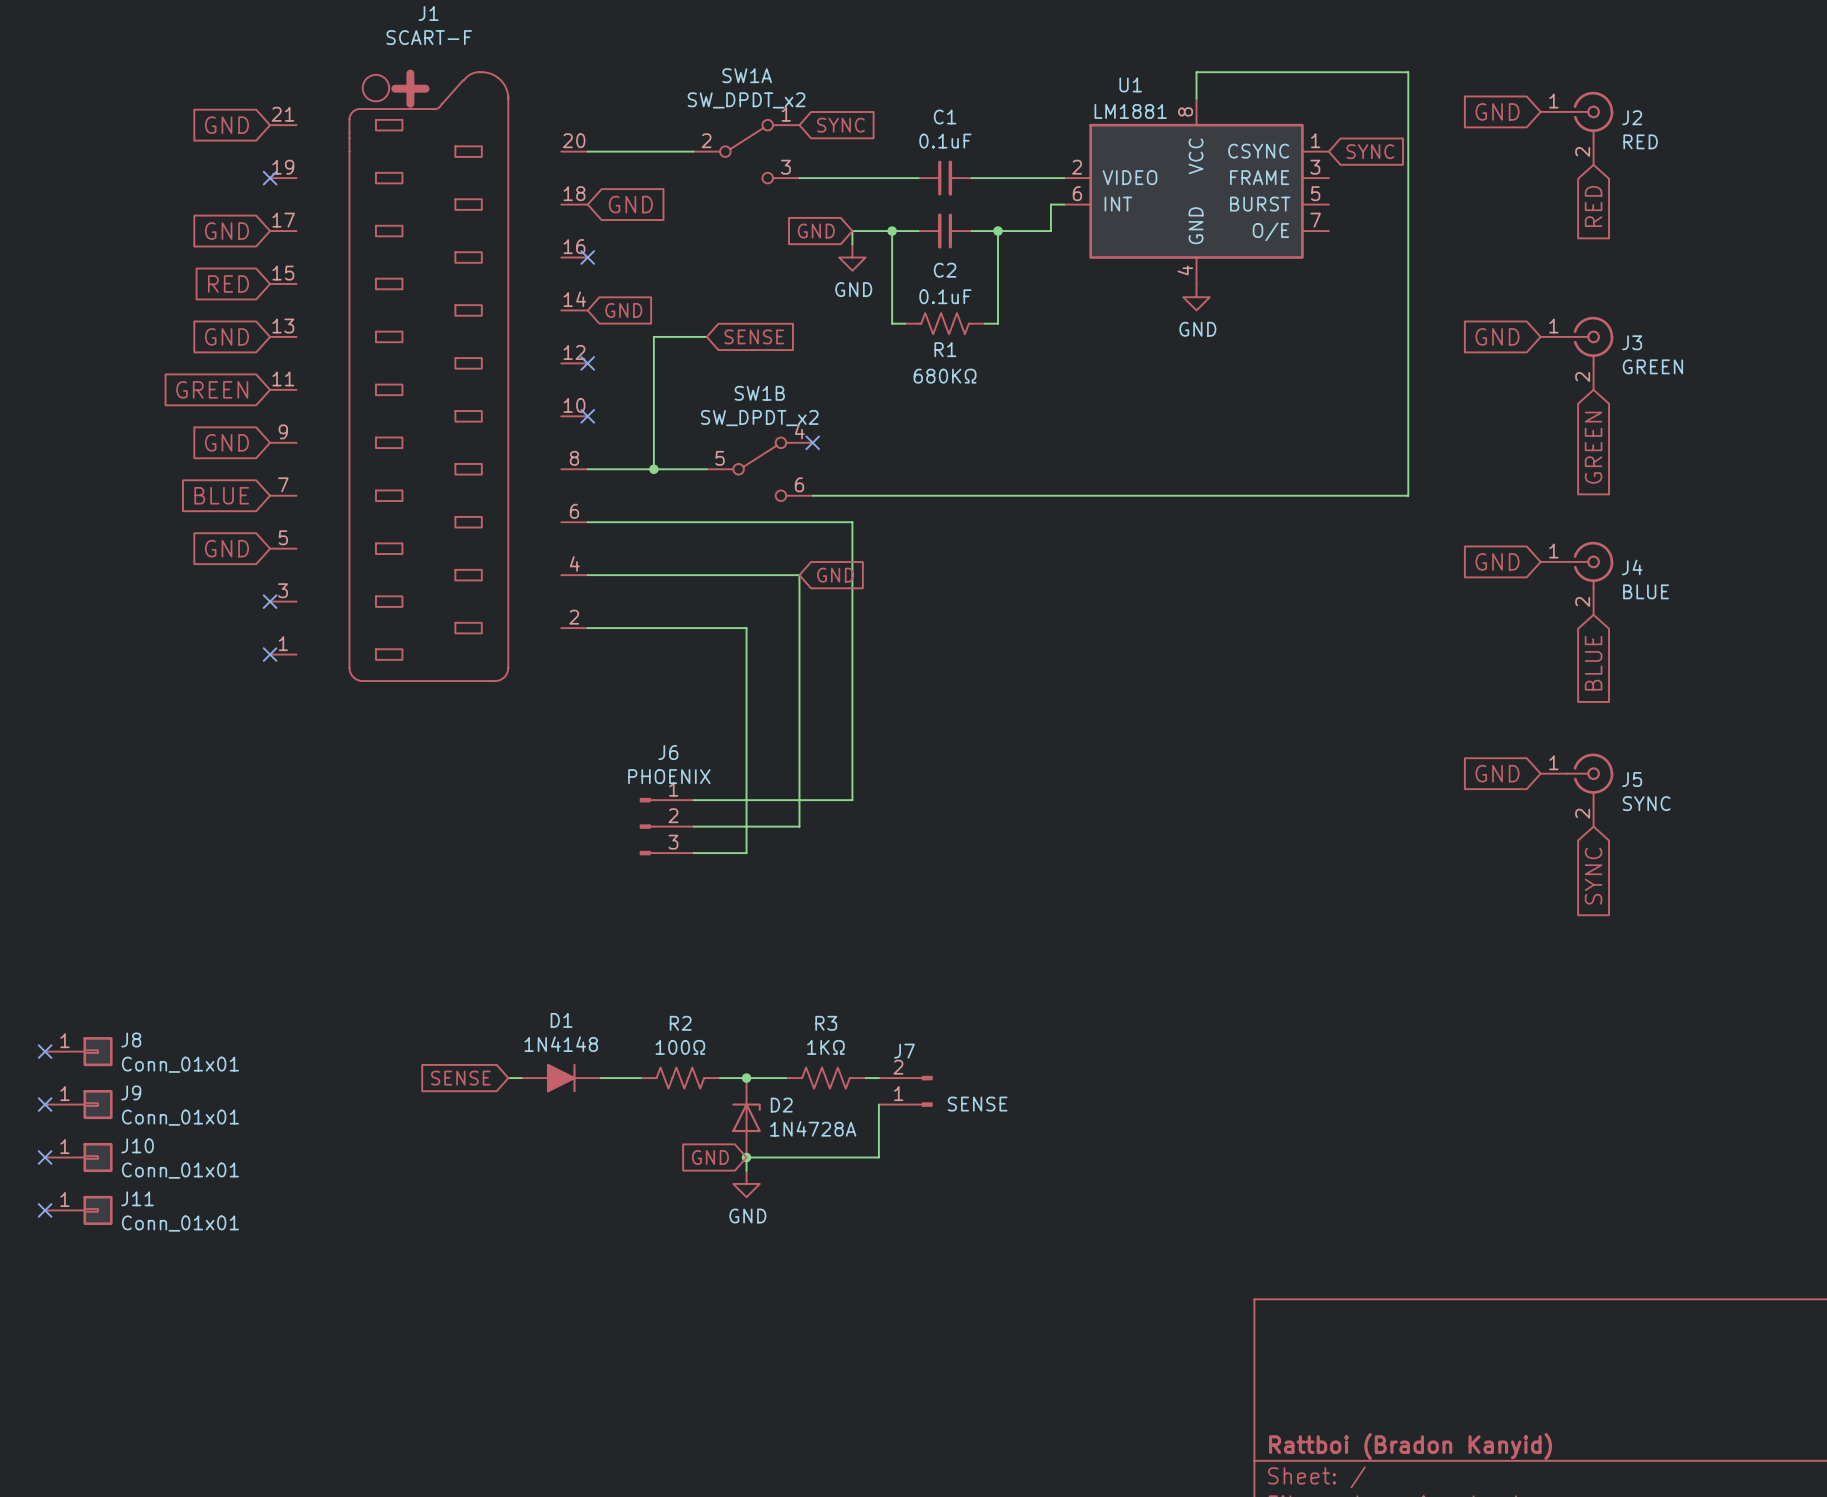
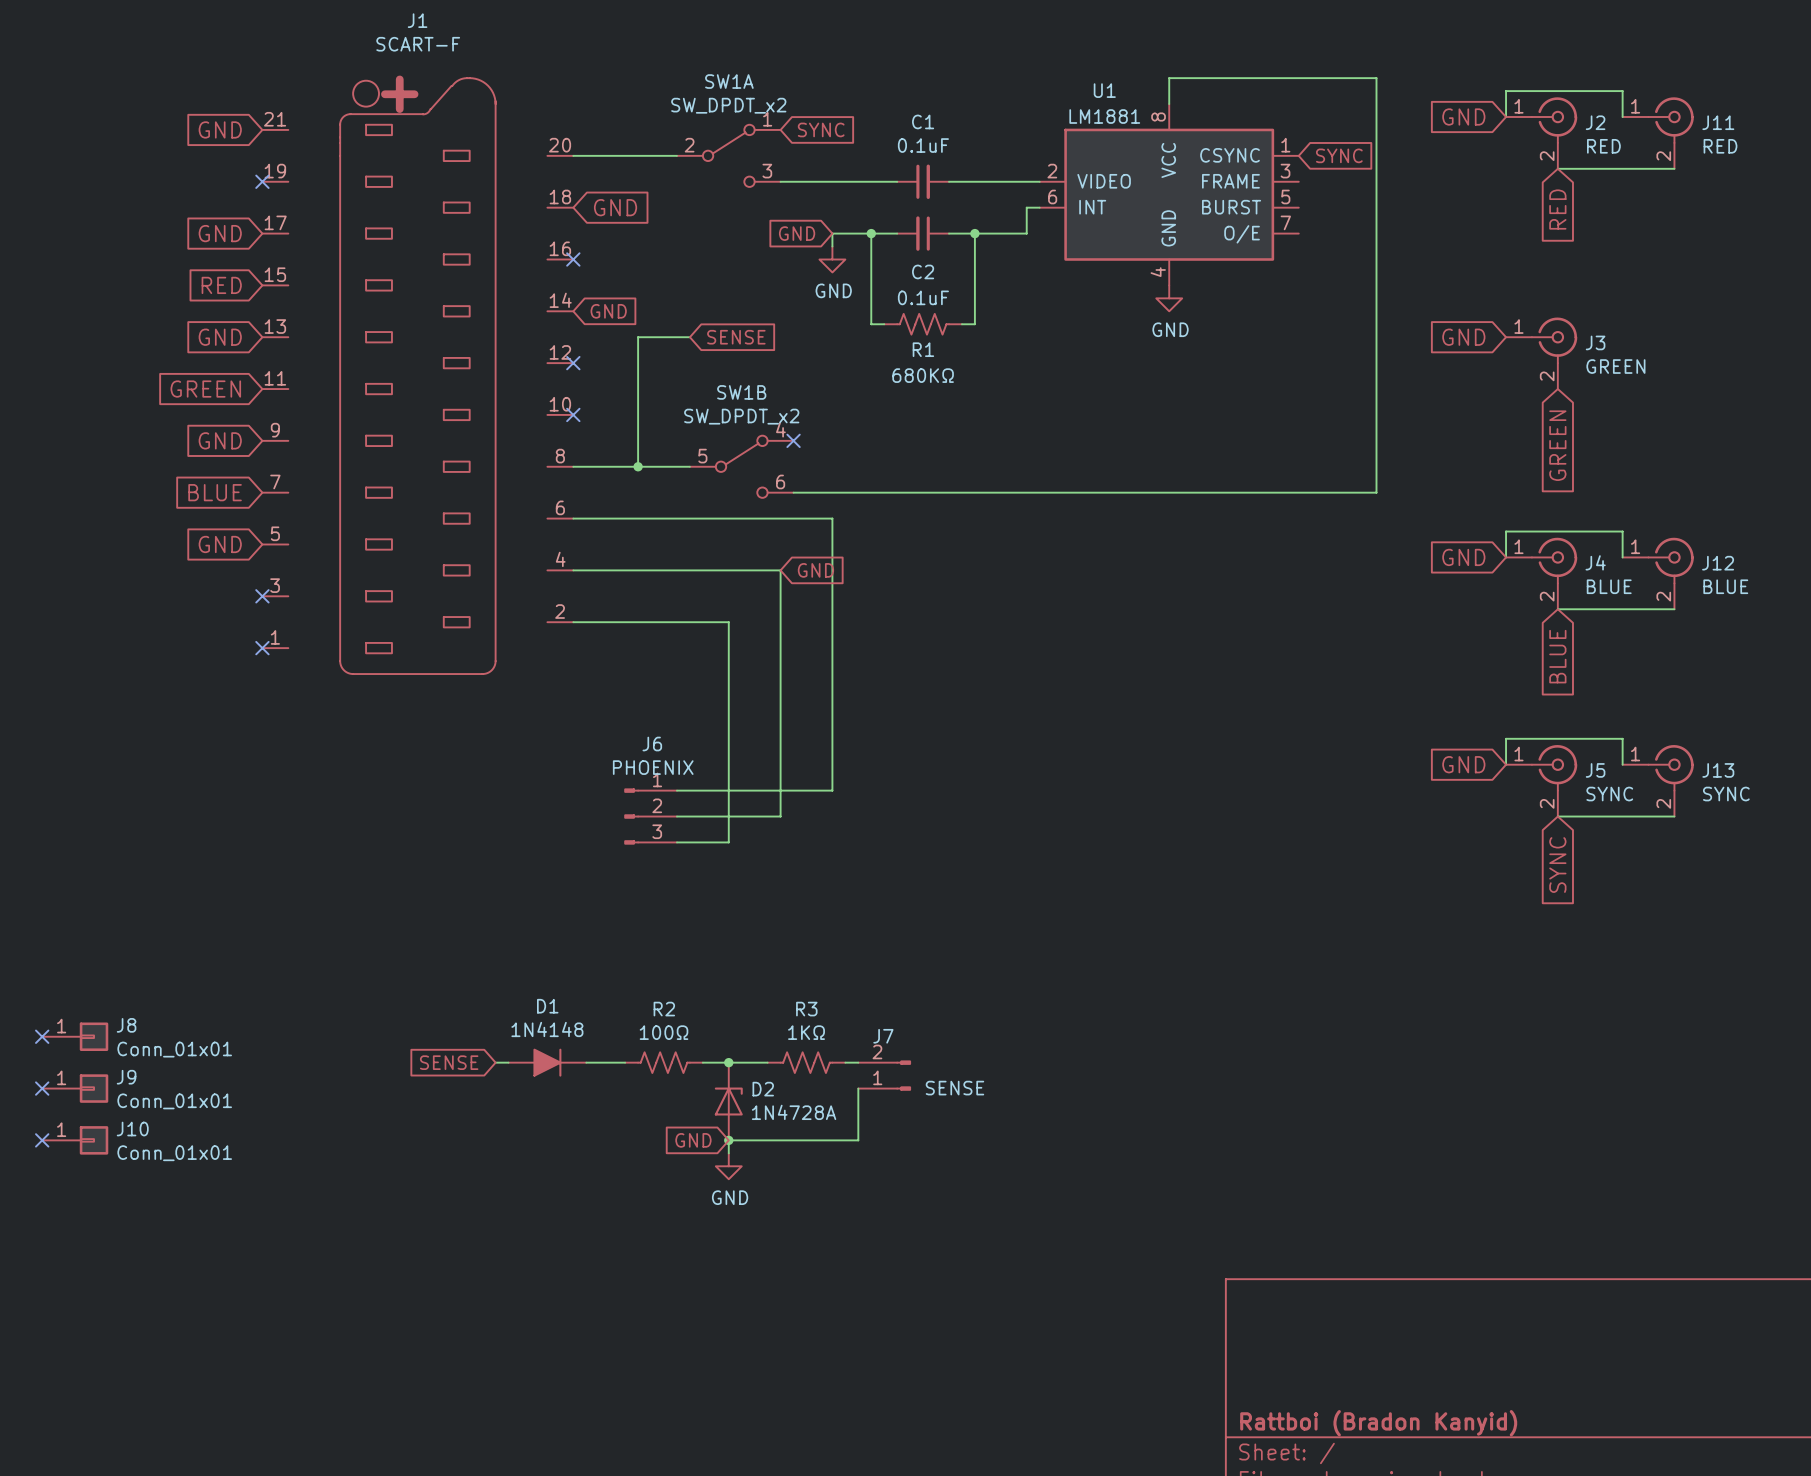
wire: none -> (1506, 116) (1506, 91) (1622, 91) (1622, 116)
wire: none -> (1557, 168) (1674, 168)
wire: none -> (1506, 557) (1506, 531) (1622, 531) (1622, 557)
J12: none -> BLUE (1658, 573)
wire: none -> (1557, 609) (1674, 609)
wire: none -> (1506, 764) (1506, 738) (1622, 738) (1622, 764)
J13: none -> SYNC (1658, 780)
wire: none -> (1557, 816) (1674, 816)
J11 symbol: [45, 1195, 113, 1225] -> [1622, 97, 1694, 169]
no-connect mark: (45, 1210) -> none
J11 value: Conn_01x01 (180, 1223) -> RED (1720, 146)

